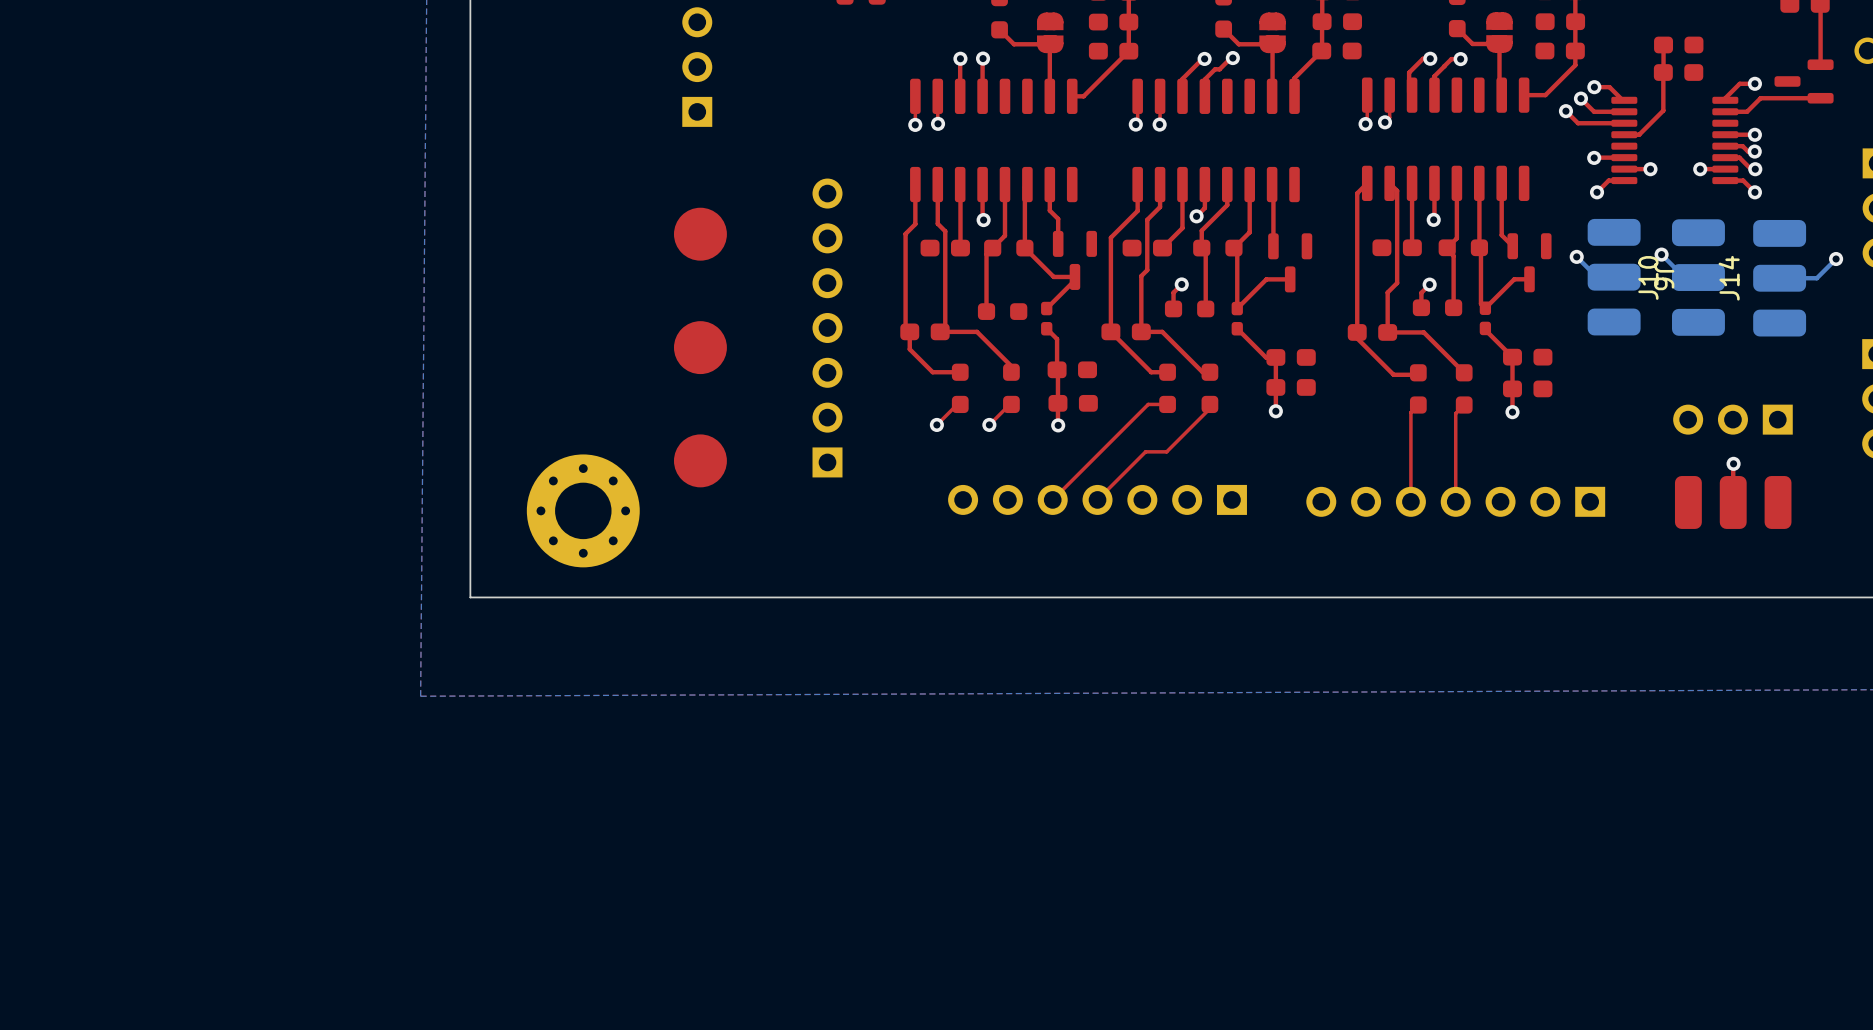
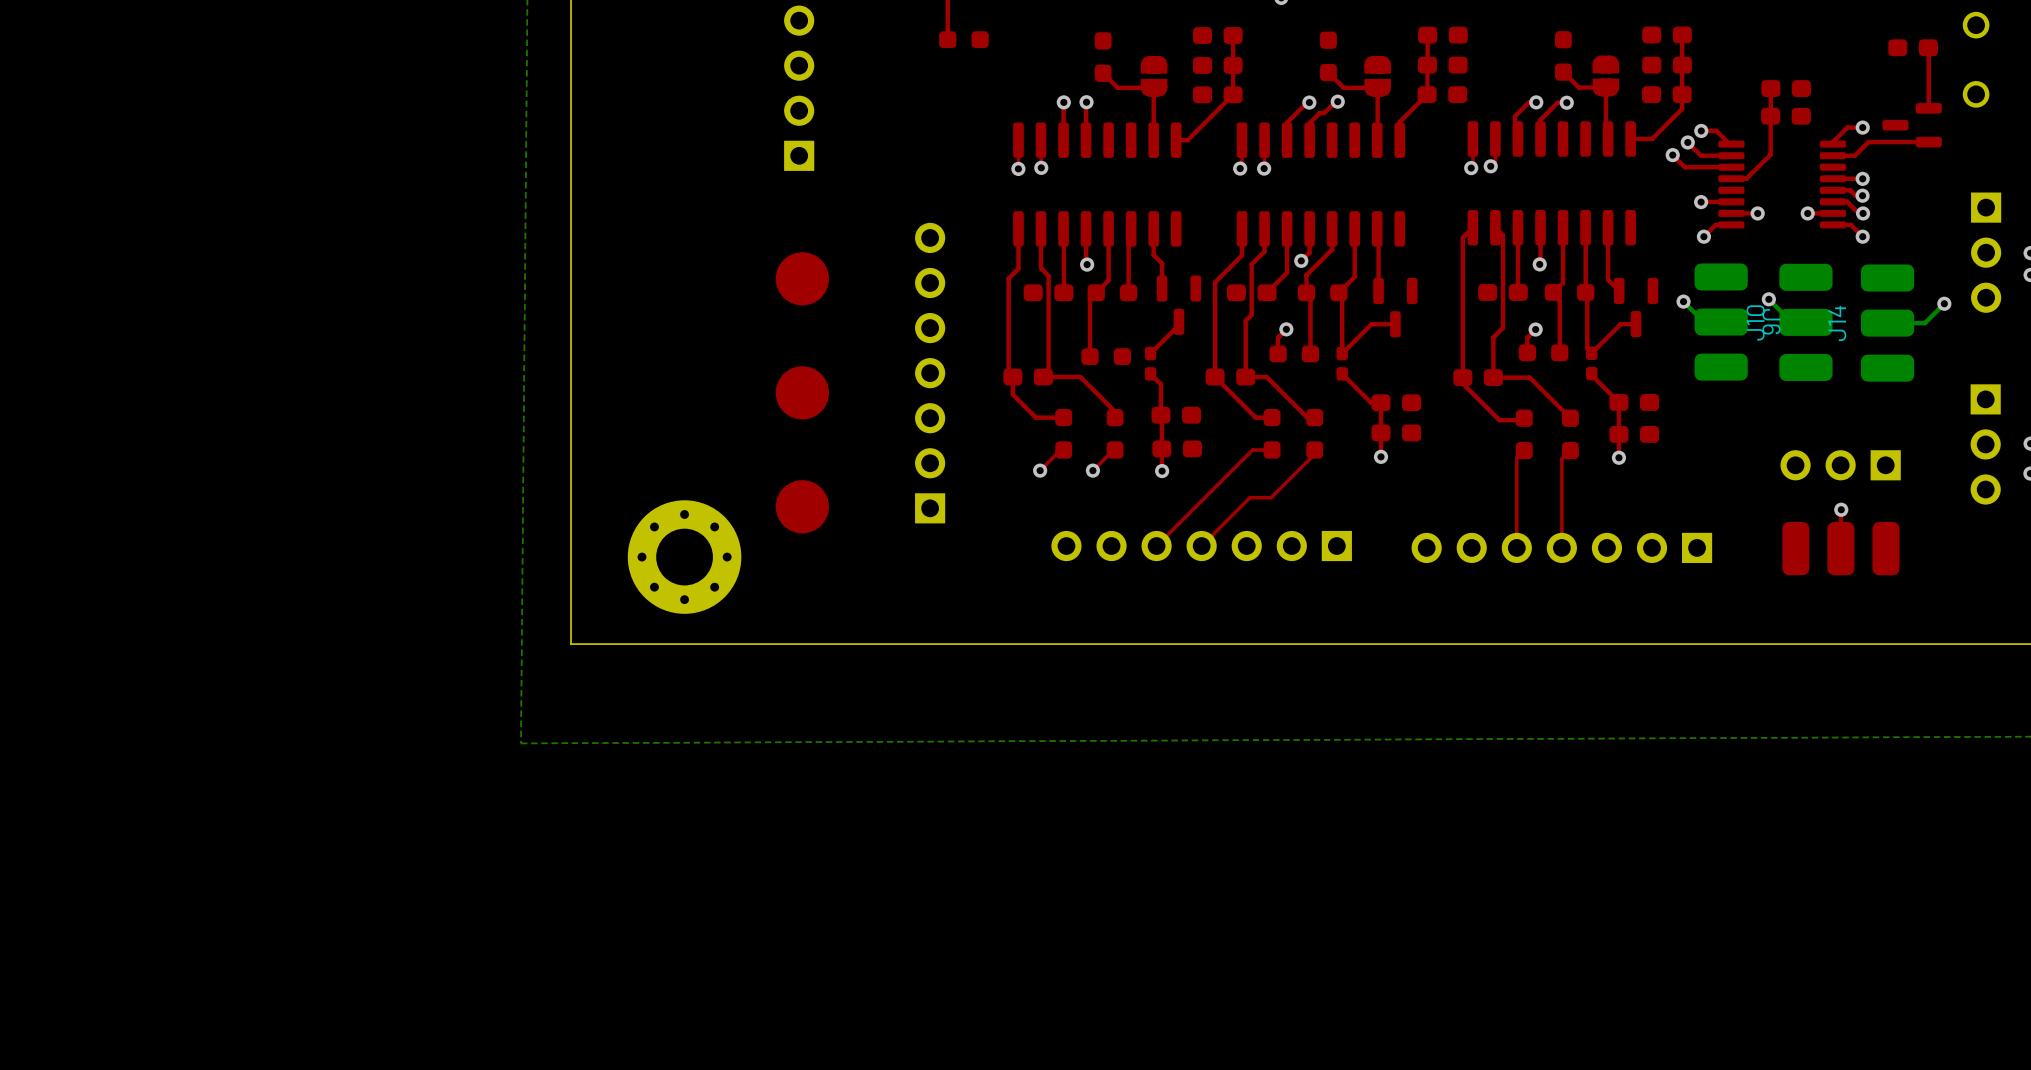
top track: (1024, 248) (1053, 276) (1074, 276) -> none

